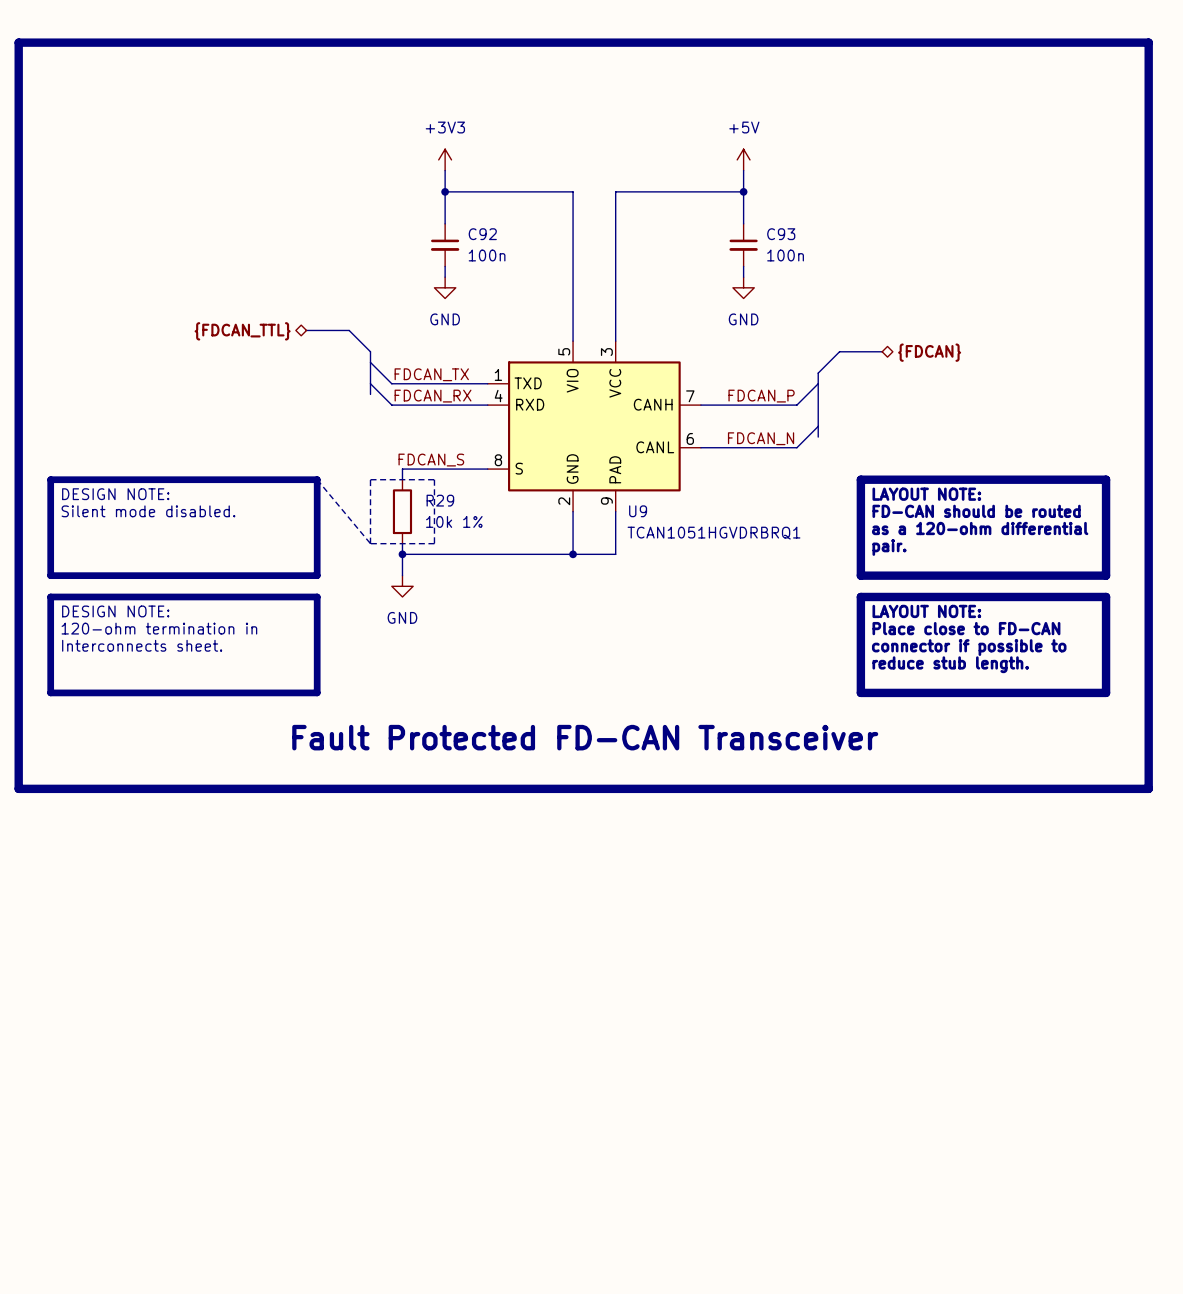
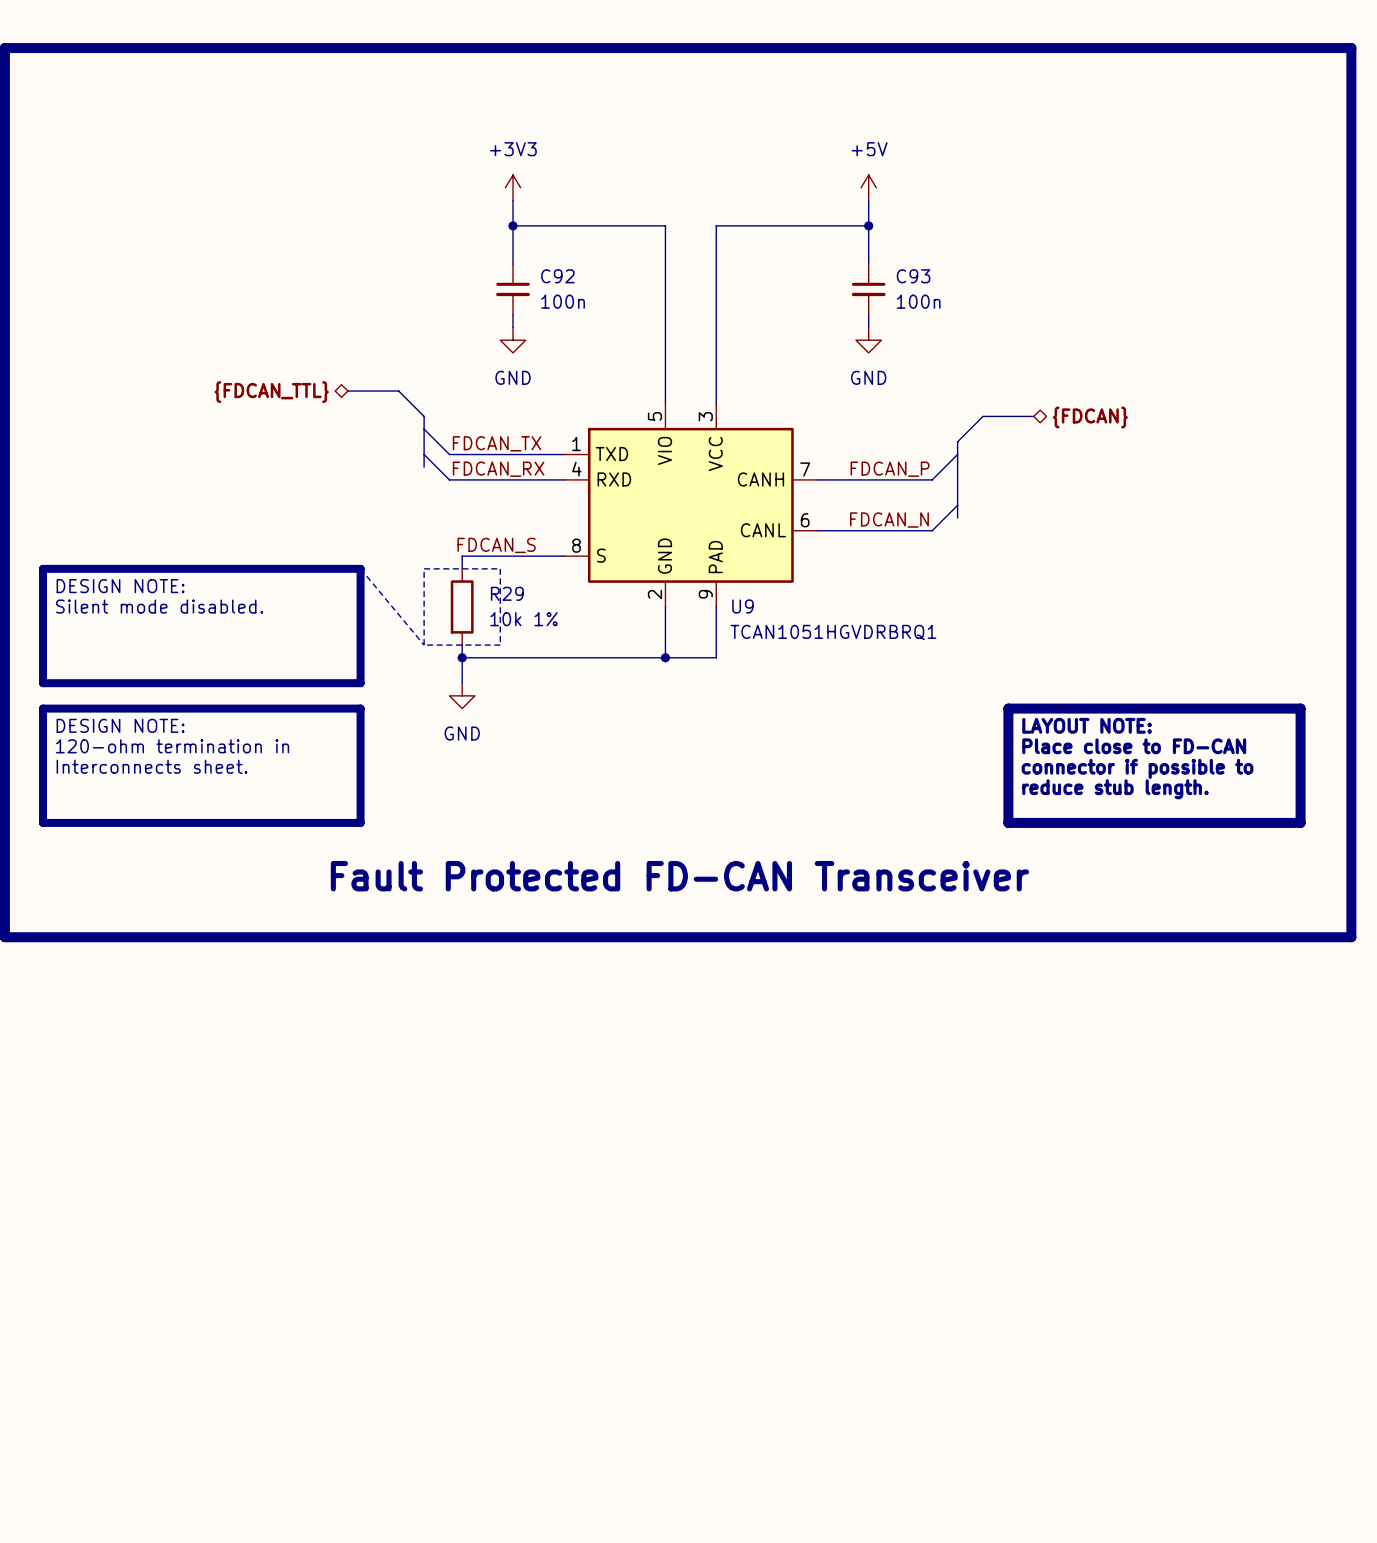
line: (860, 479) (1106, 479) (1106, 575) (860, 575) (860, 479) -> none
text: LAYOUT NOTE: (926, 494) -> none
text: FD-CAN should be routed (976, 511) -> none
text: as a 120-ohm differential (980, 528) -> none
text: pair. (889, 547) -> none

